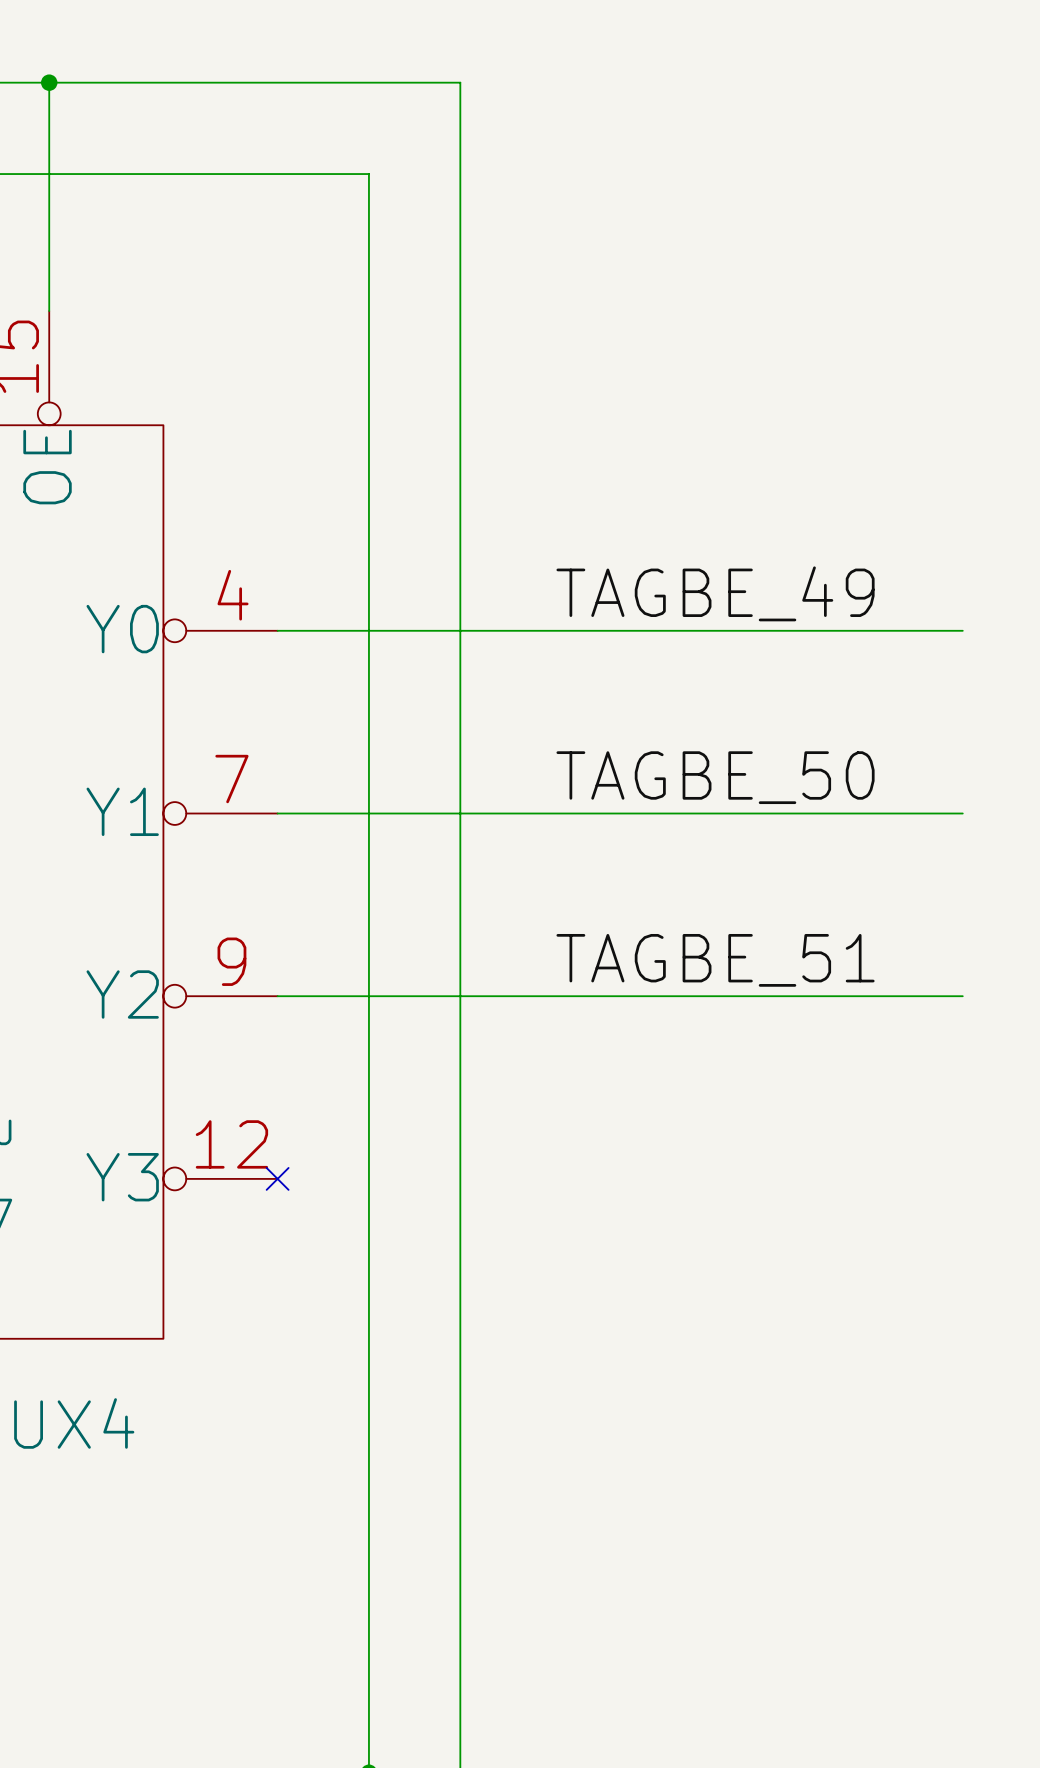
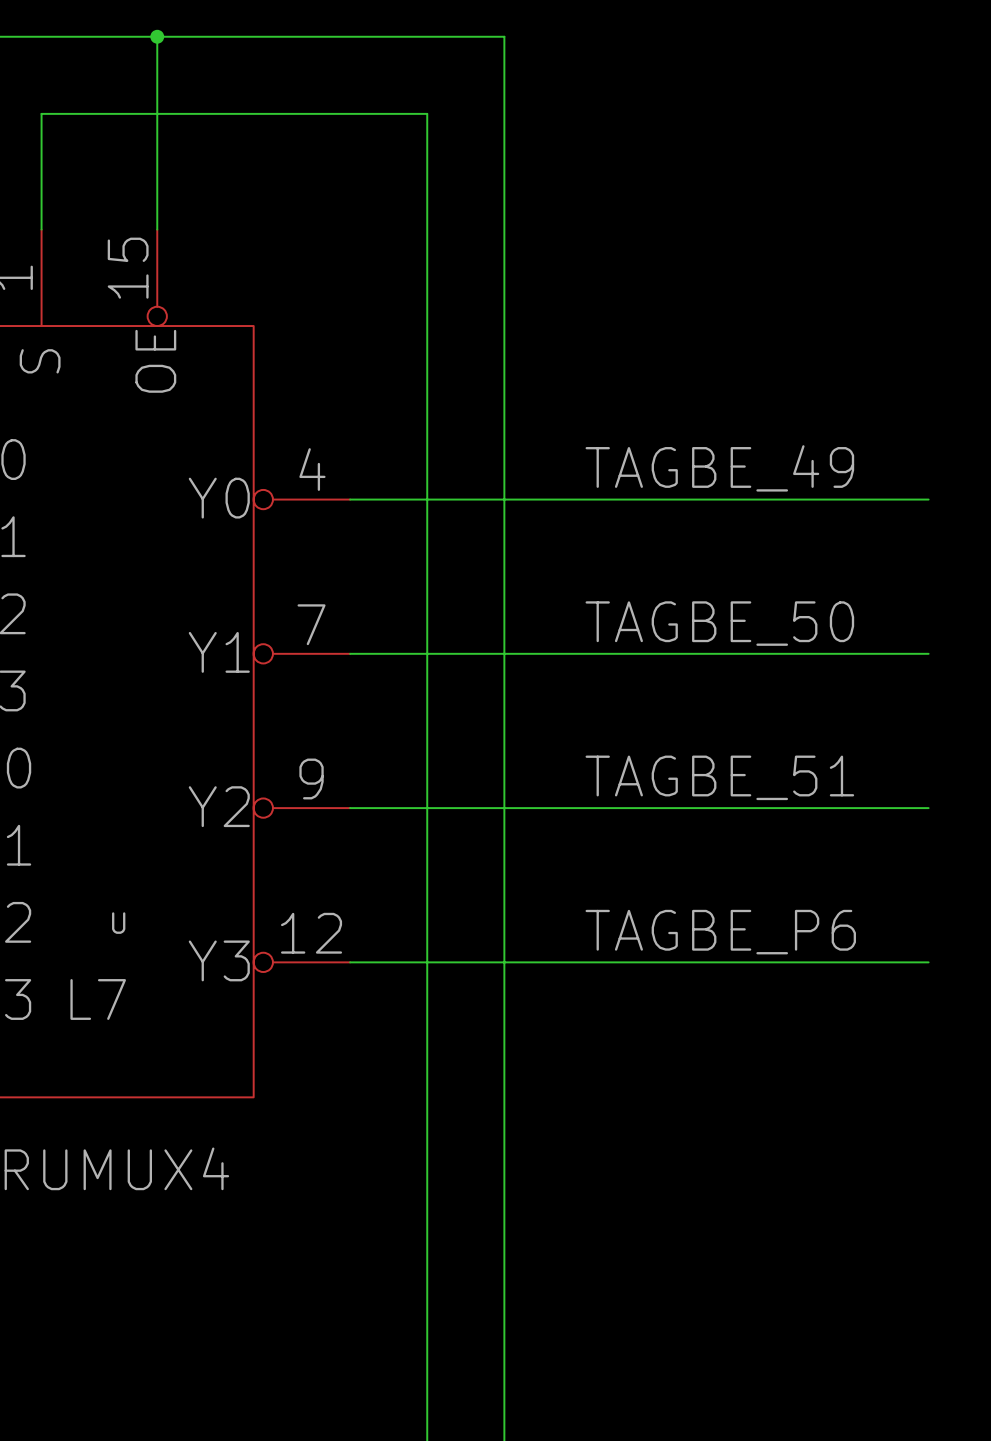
label: none -> TAGBE_P6 (720, 932)
wire: none -> (350, 962) (928, 962)
no-connect mark: (277, 1178) -> none

